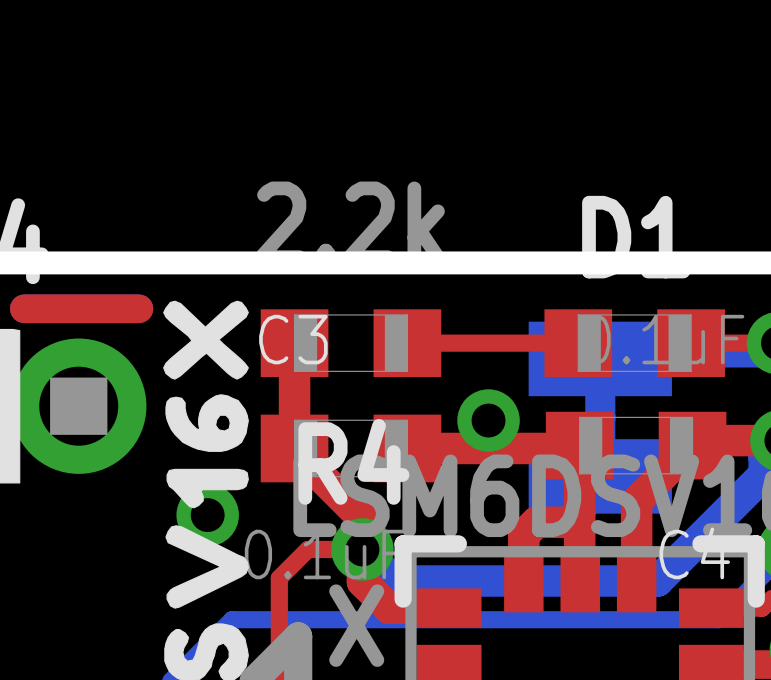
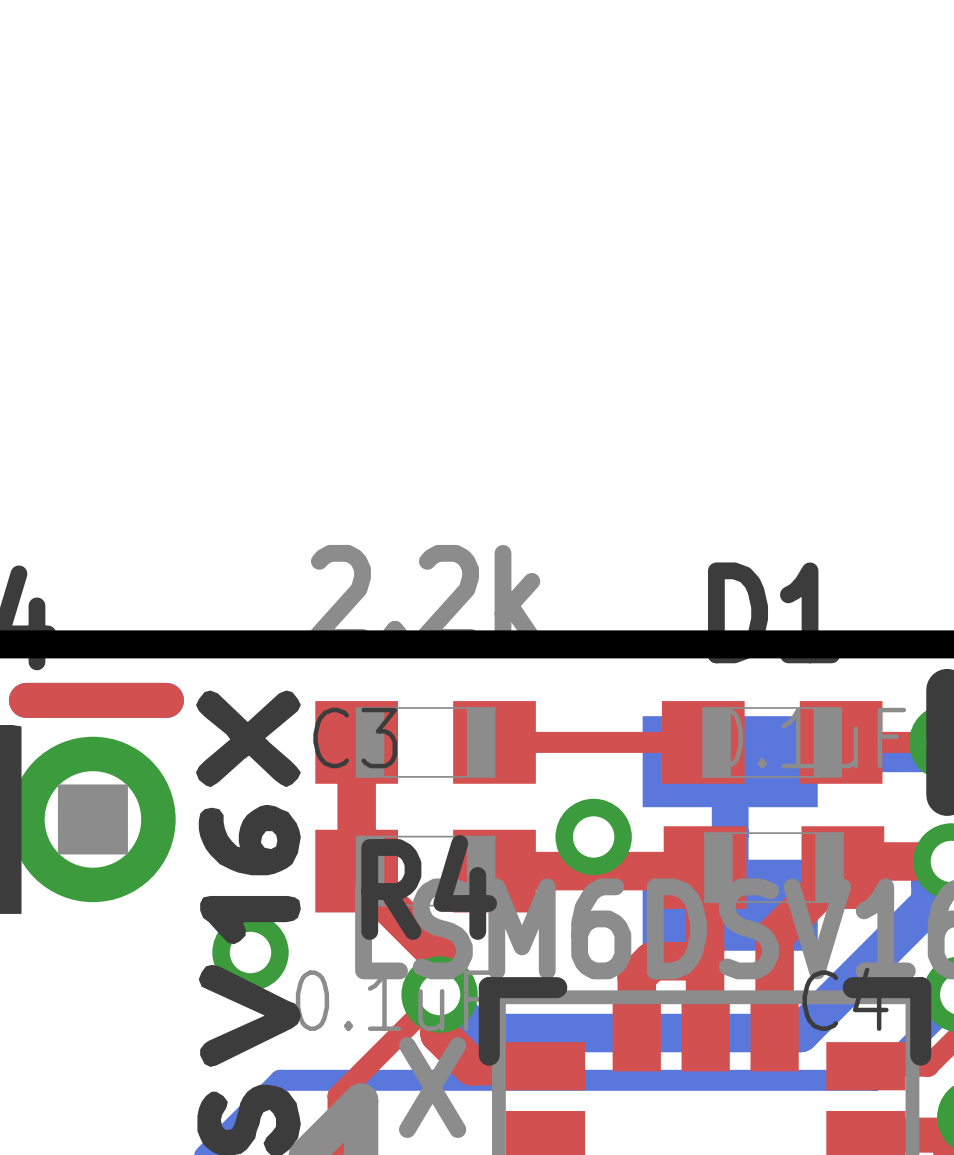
top track: (362, 549) (308, 549) (279, 578) (279, 632) -> (439, 994) (338, 1096)

